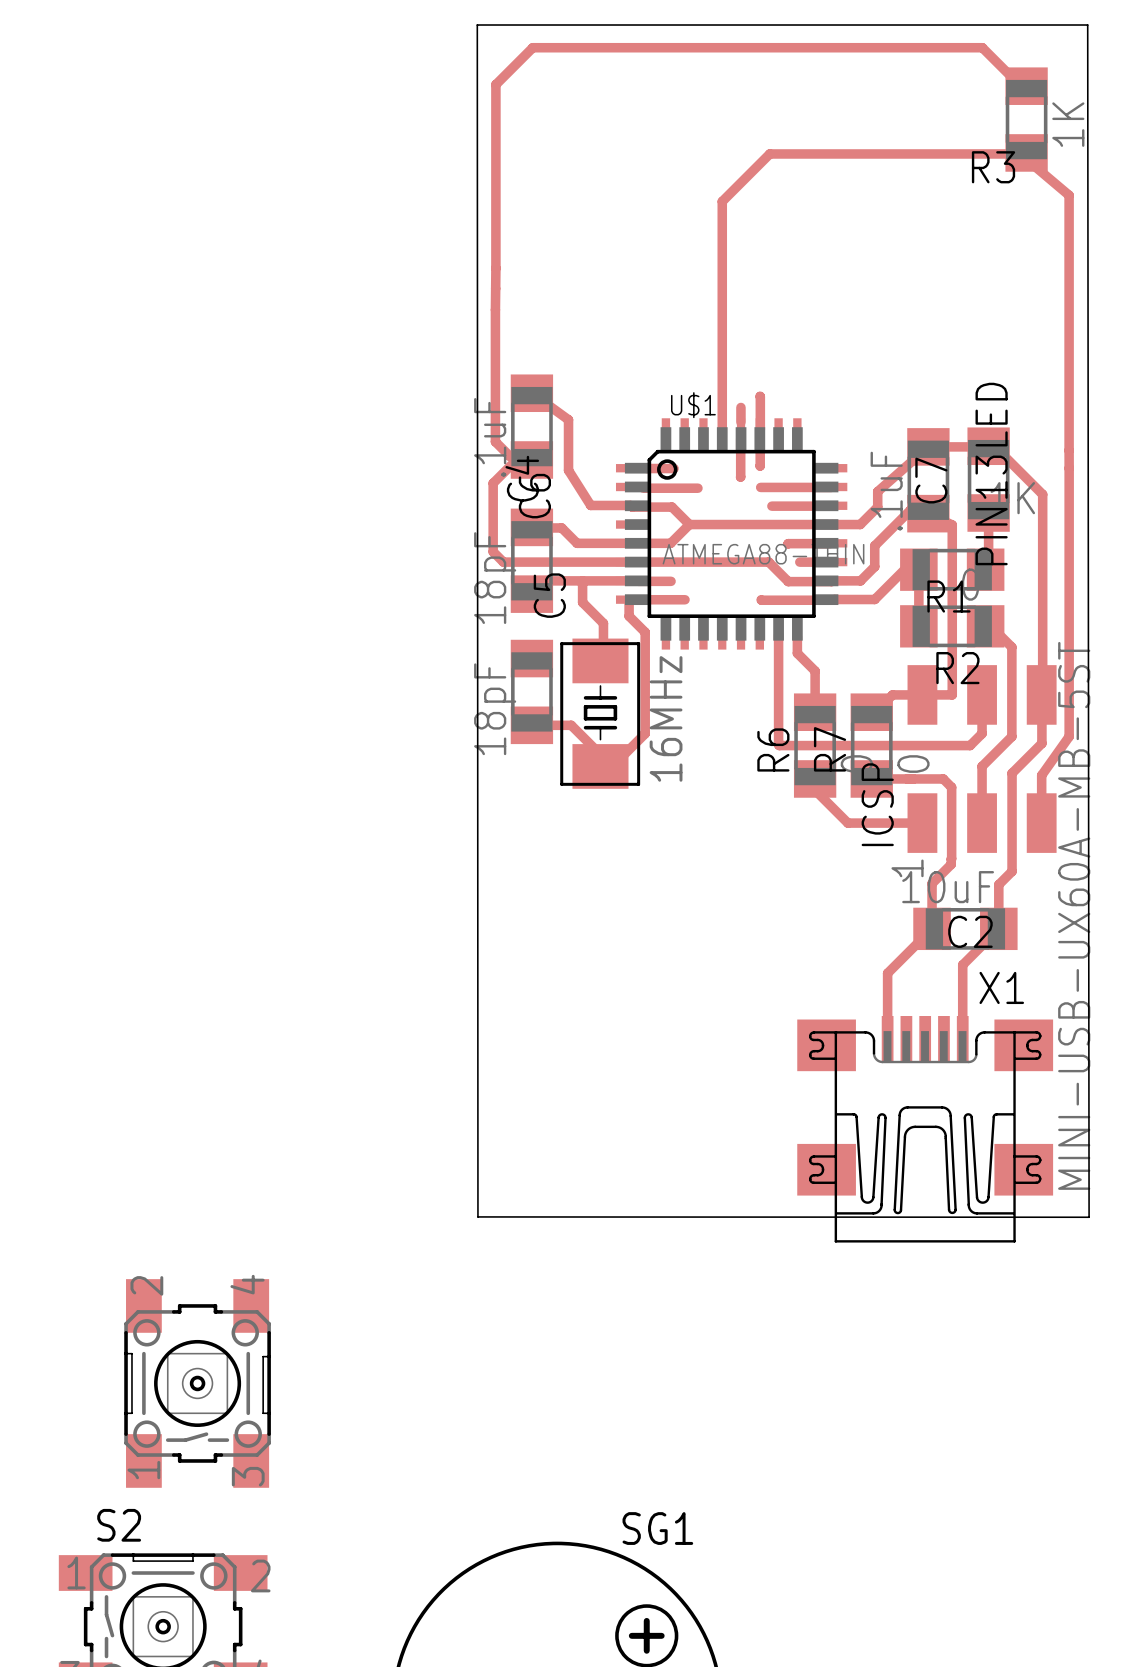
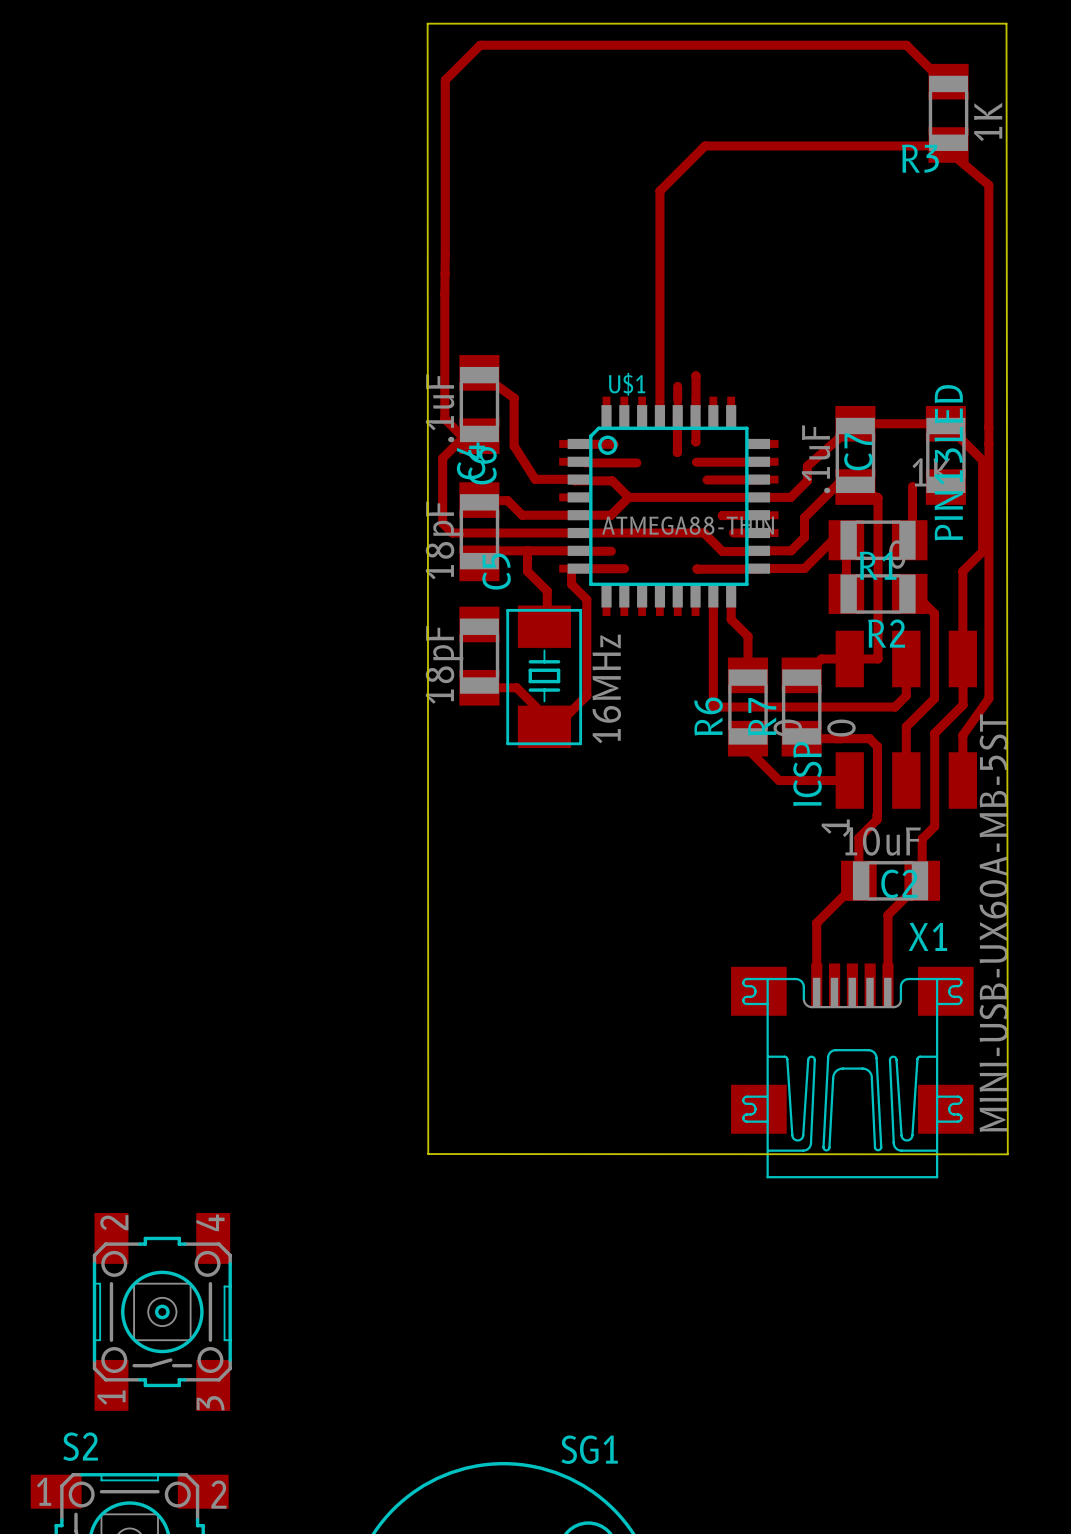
track: (987, 446) (994, 446) (1042, 494) (1041, 695) -> (911, 423) (945, 423) (982, 460) (982, 551) (962, 571) (962, 658)
PIN13LED position: (988, 479) -> (945, 455)

